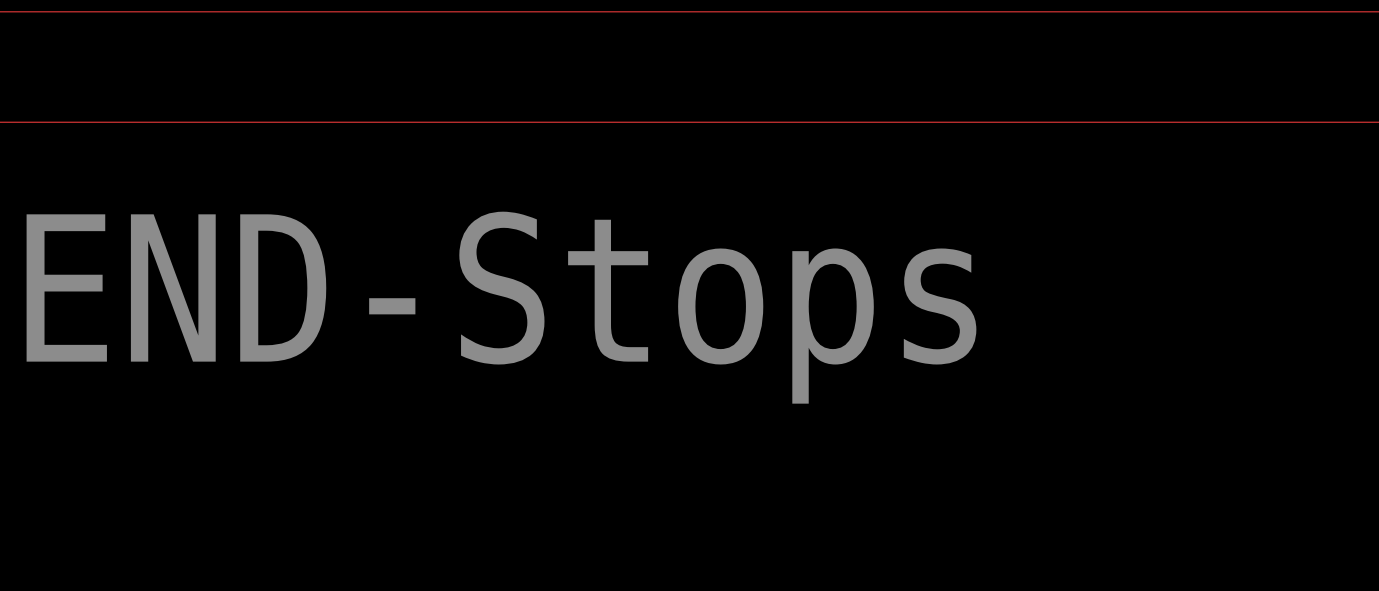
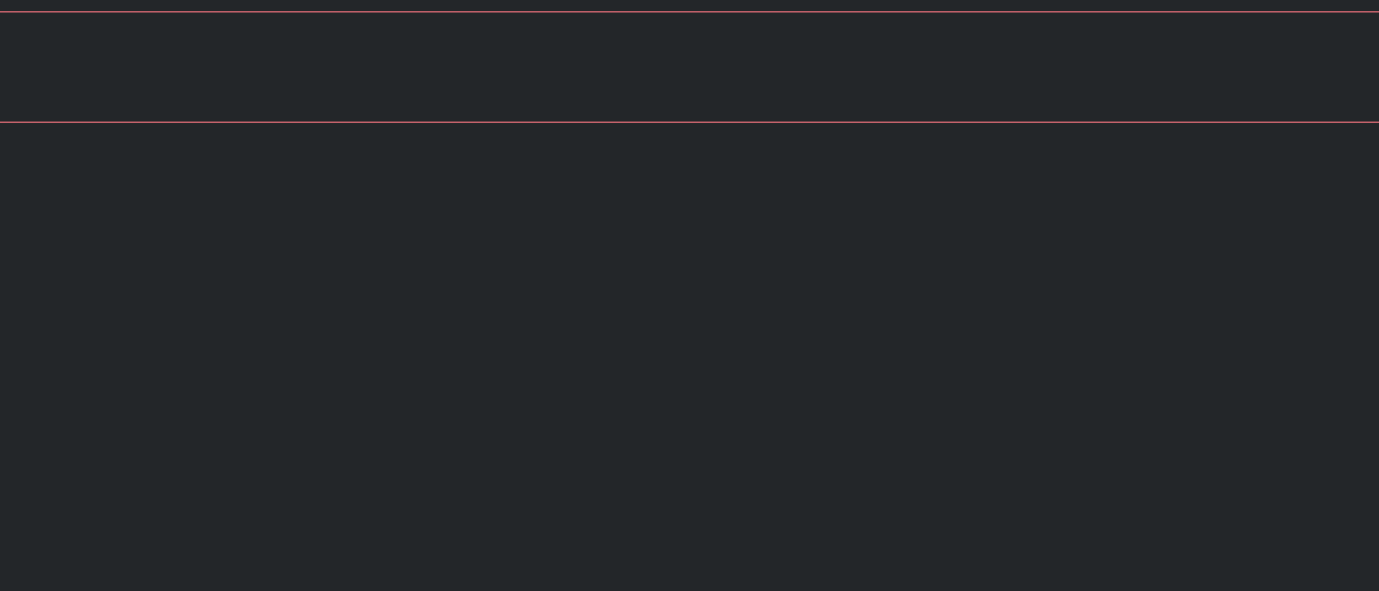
text: END-Stops (501, 307) -> none

